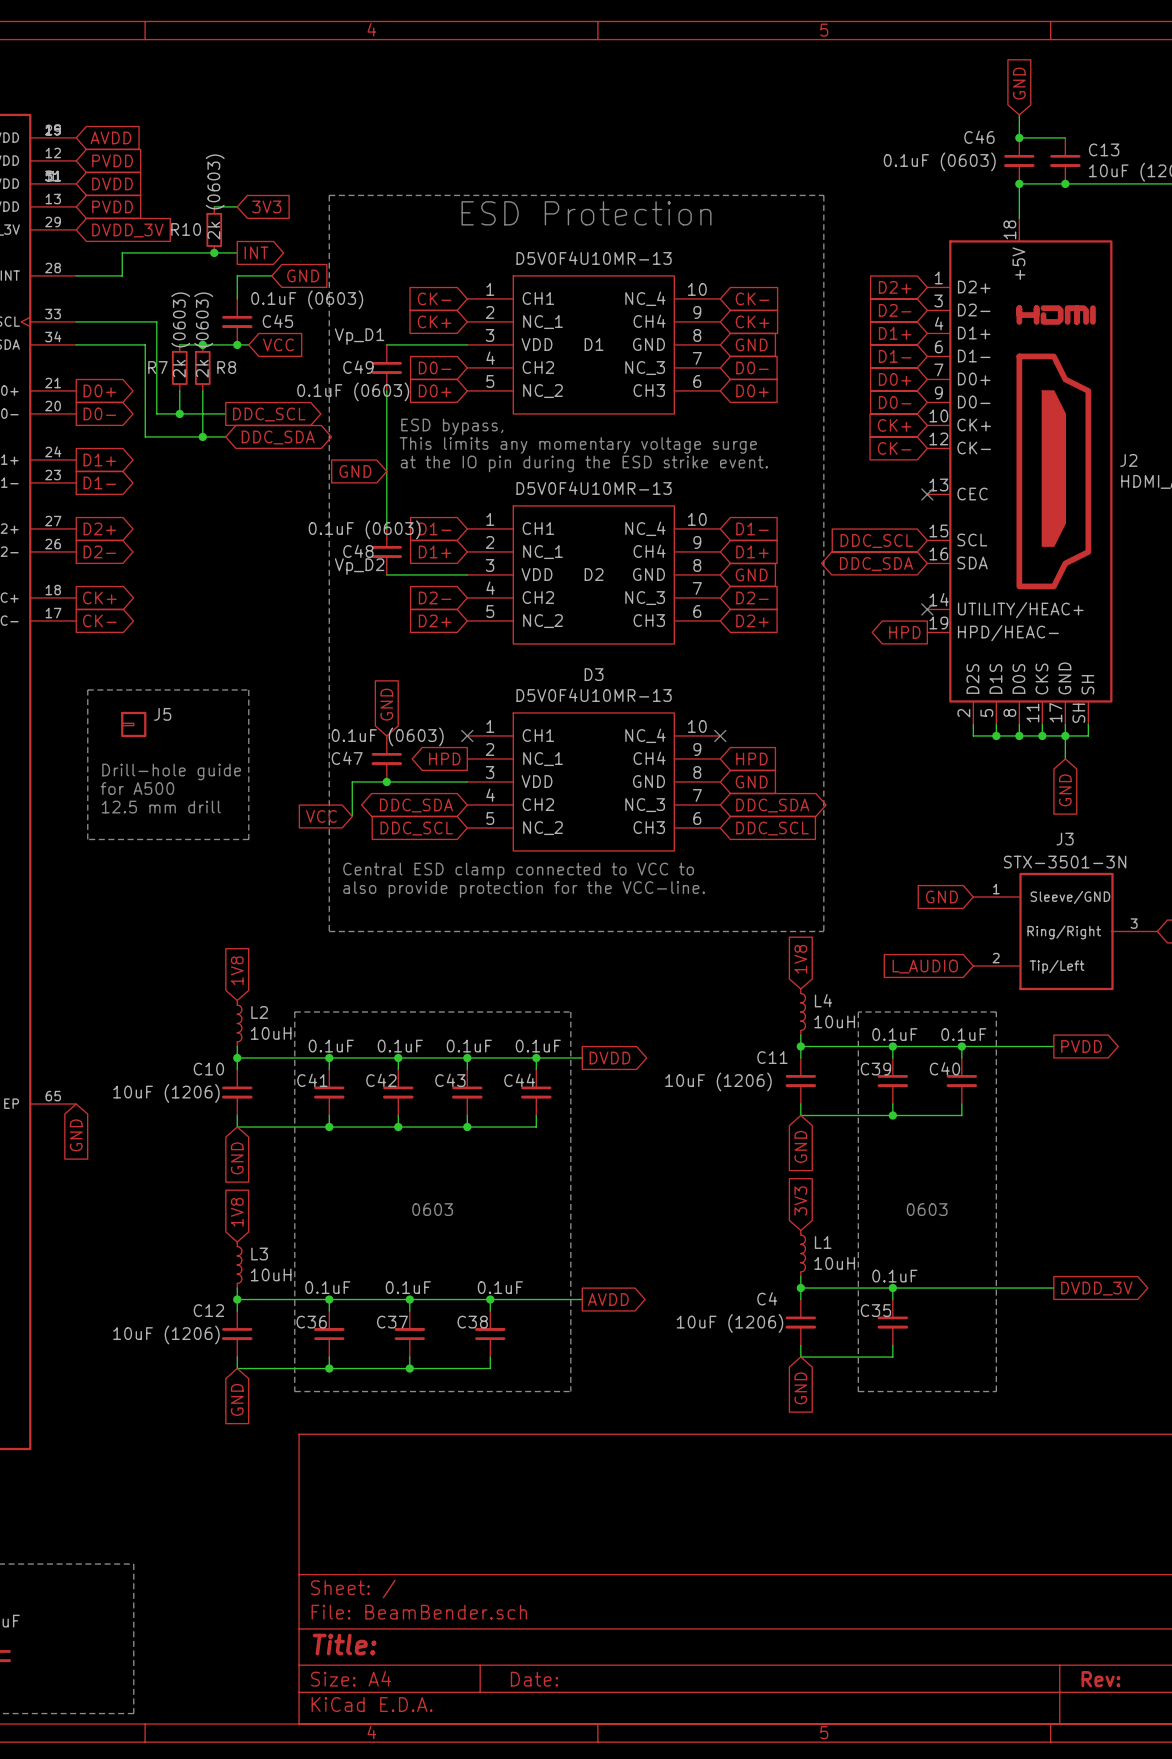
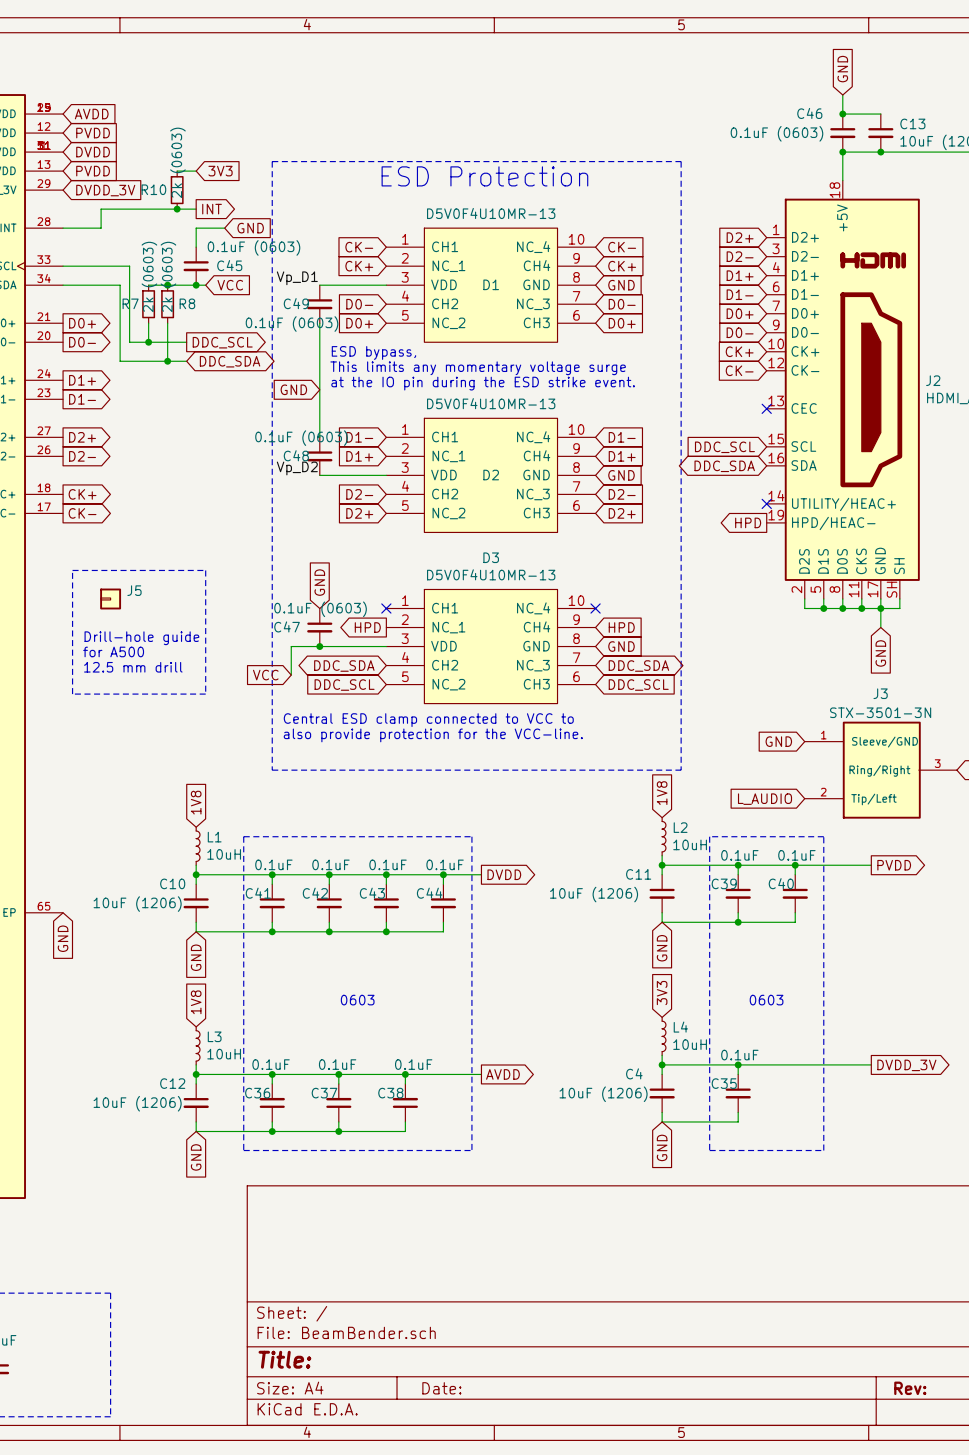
L4 name: L4 (823, 1000) -> L2 (680, 827)
L2 name: L2 (259, 1012) -> L1 (214, 837)
L1 name: L1 (823, 1242) -> L4 (680, 1027)

